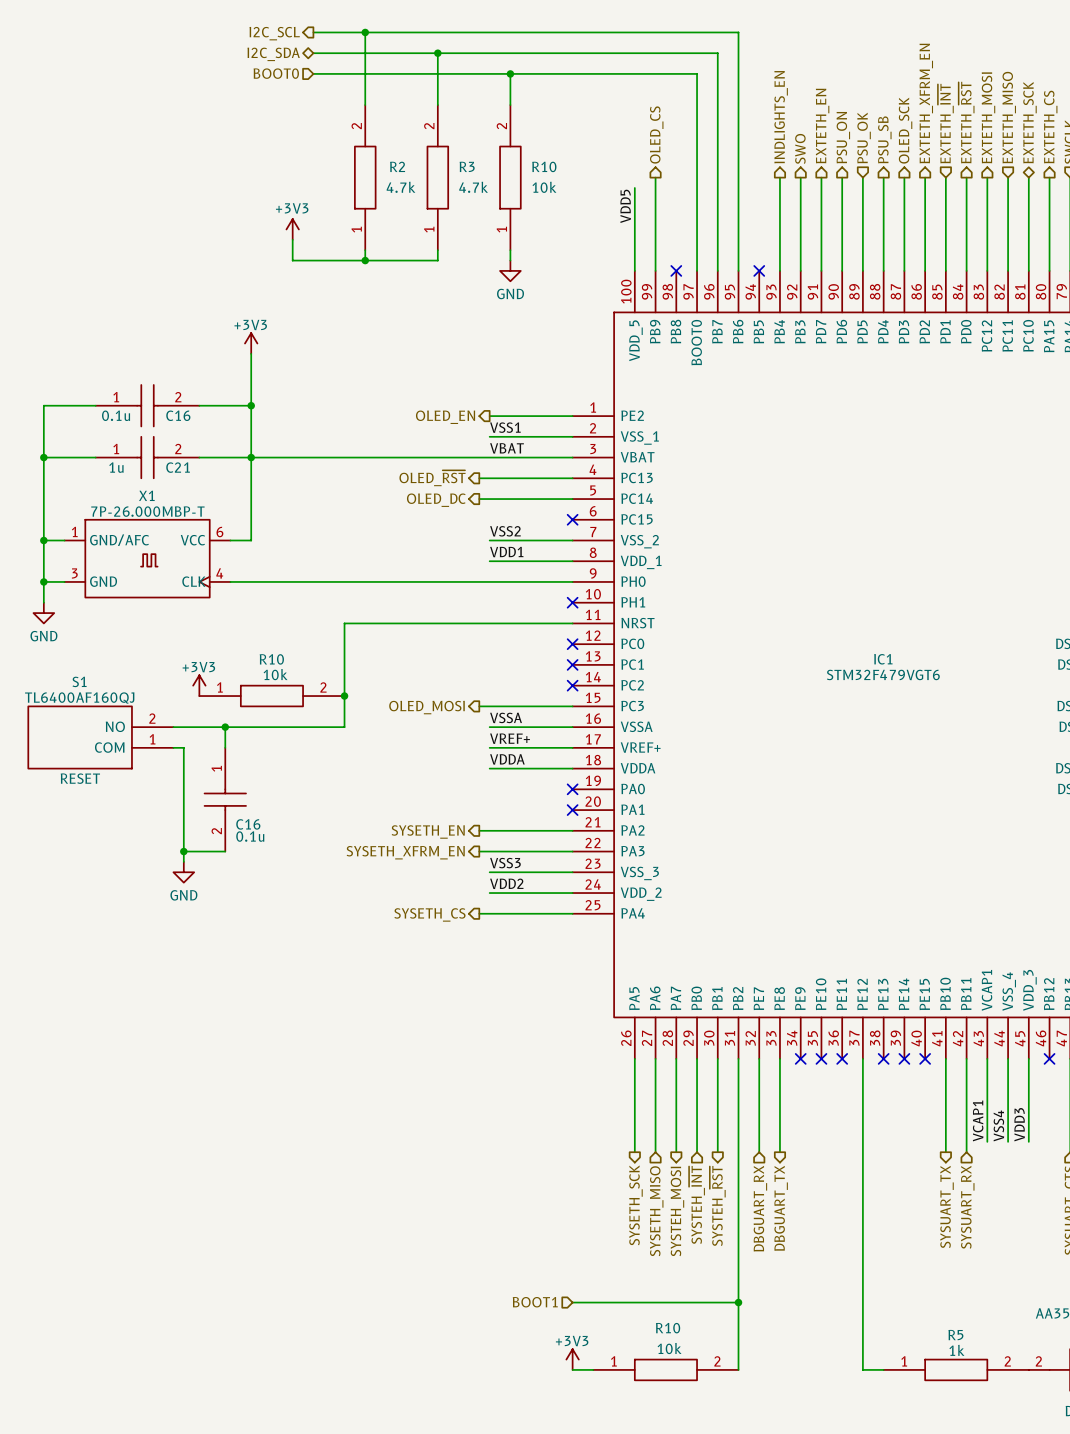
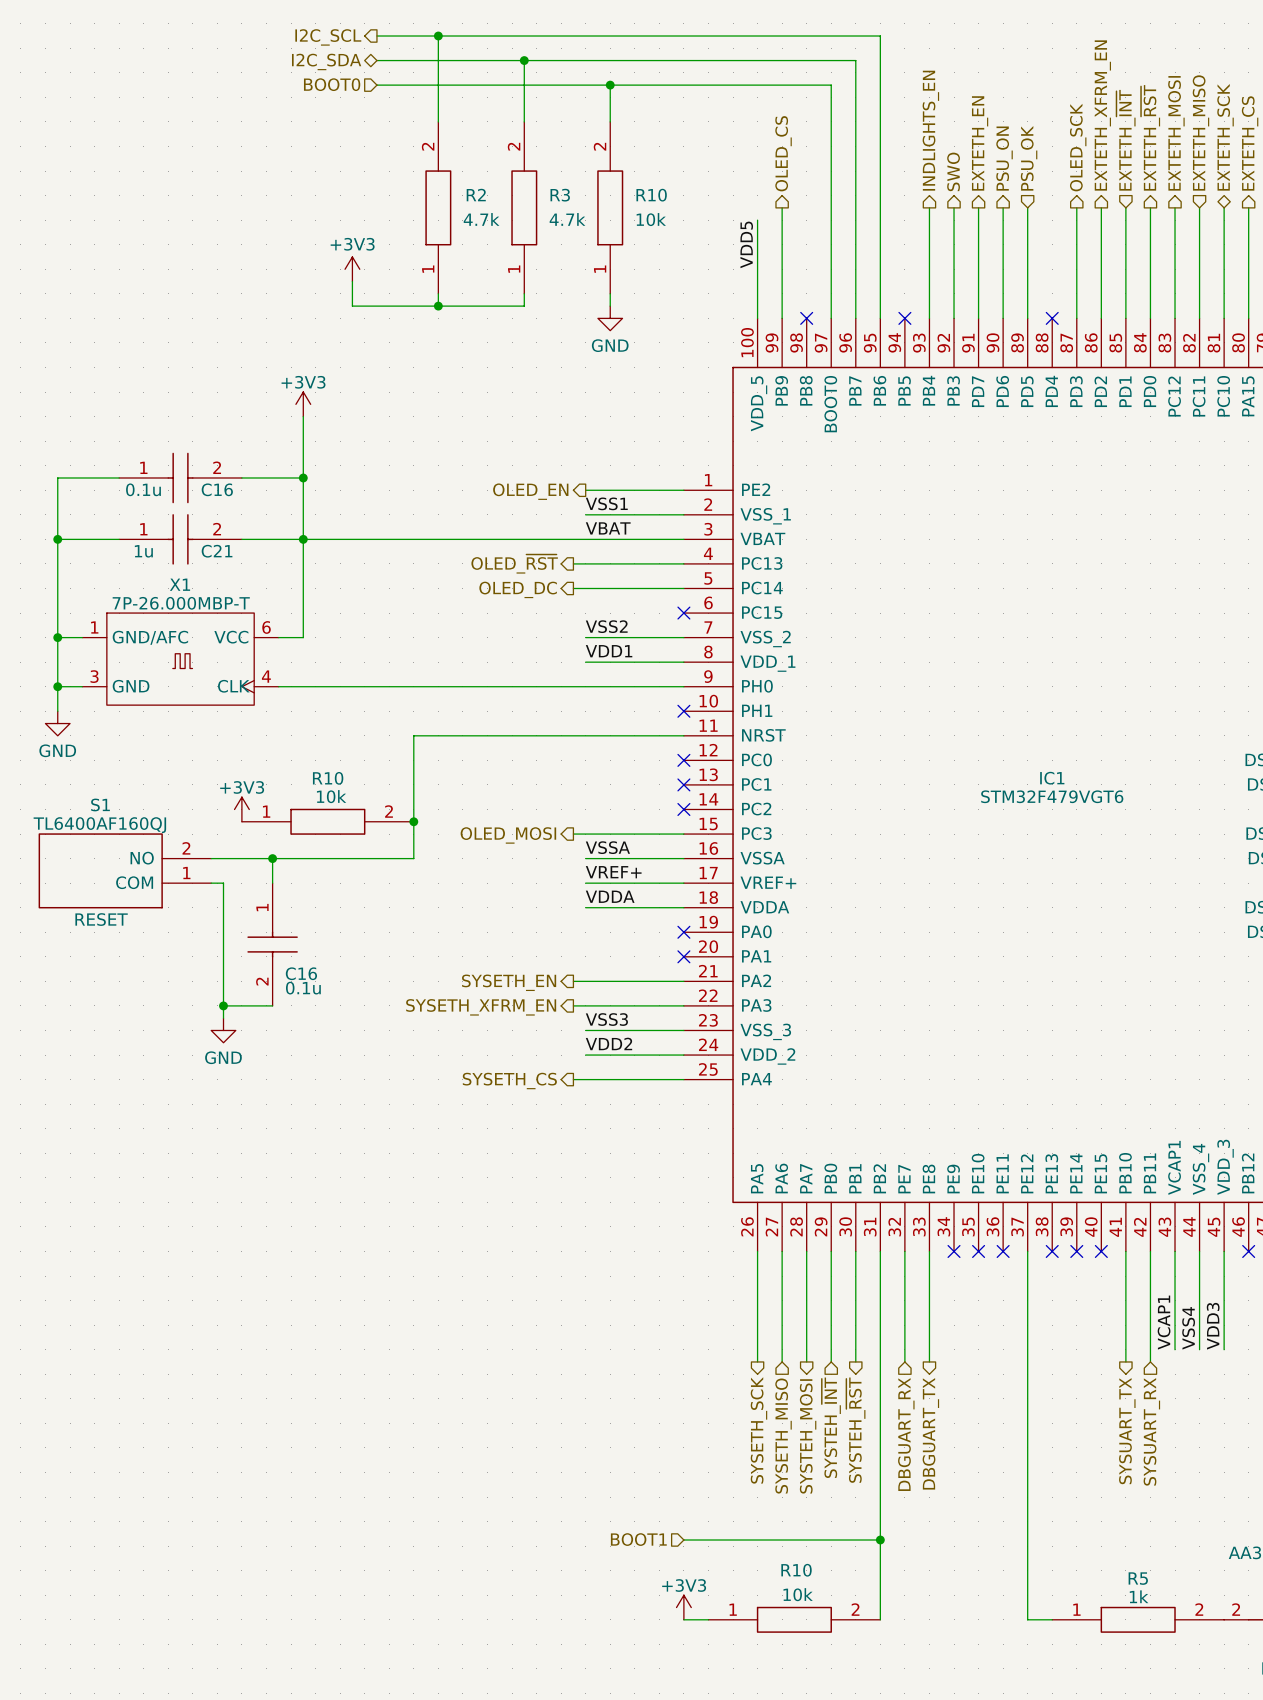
hierarchical label: PSU_SB (884, 139) -> none
wire: (883, 177) (883, 270) -> none
no-connect mark: none -> (1052, 318)

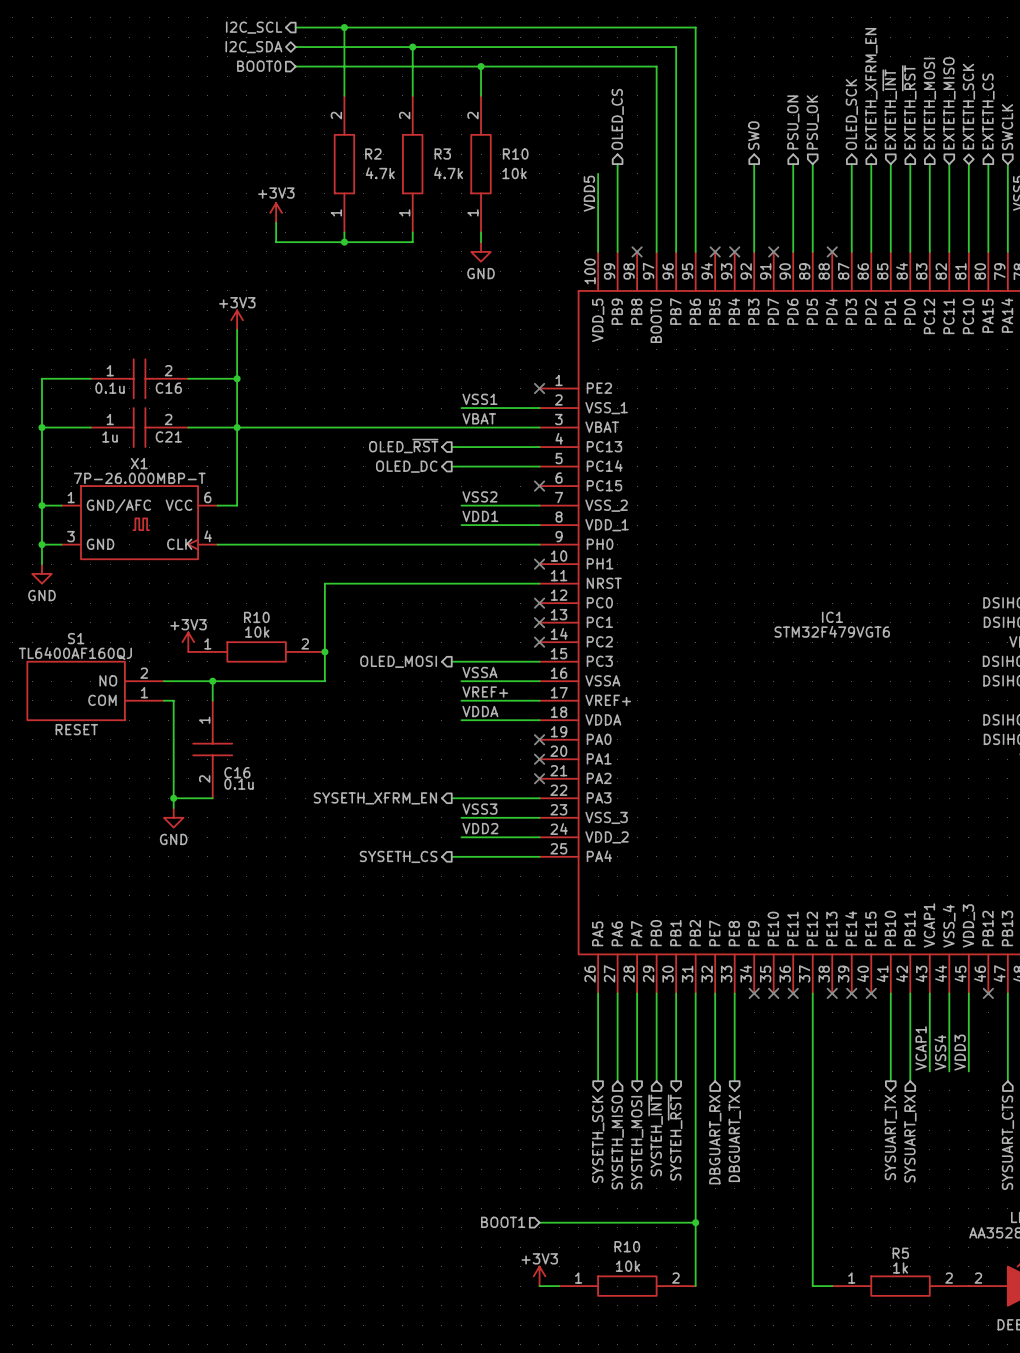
hierarchical label: INDLIGHTS_EN (930, 130) -> none
hierarchical label: EXTETH_EN (980, 143) -> none
wire: (929, 207) (929, 318) -> none
wire: (978, 207) (978, 318) -> none
no-connect mark: none -> (734, 251)
no-connect mark: none -> (773, 251)
wire: (585, 490) (683, 490) -> none
no-connect mark: none -> (539, 388)
hierarchical label: OLED_EN (530, 491) -> none
wire: (573, 981) (683, 981) -> none
no-connect mark: none -> (539, 778)
hierarchical label: SYSETH_EN (509, 982) -> none

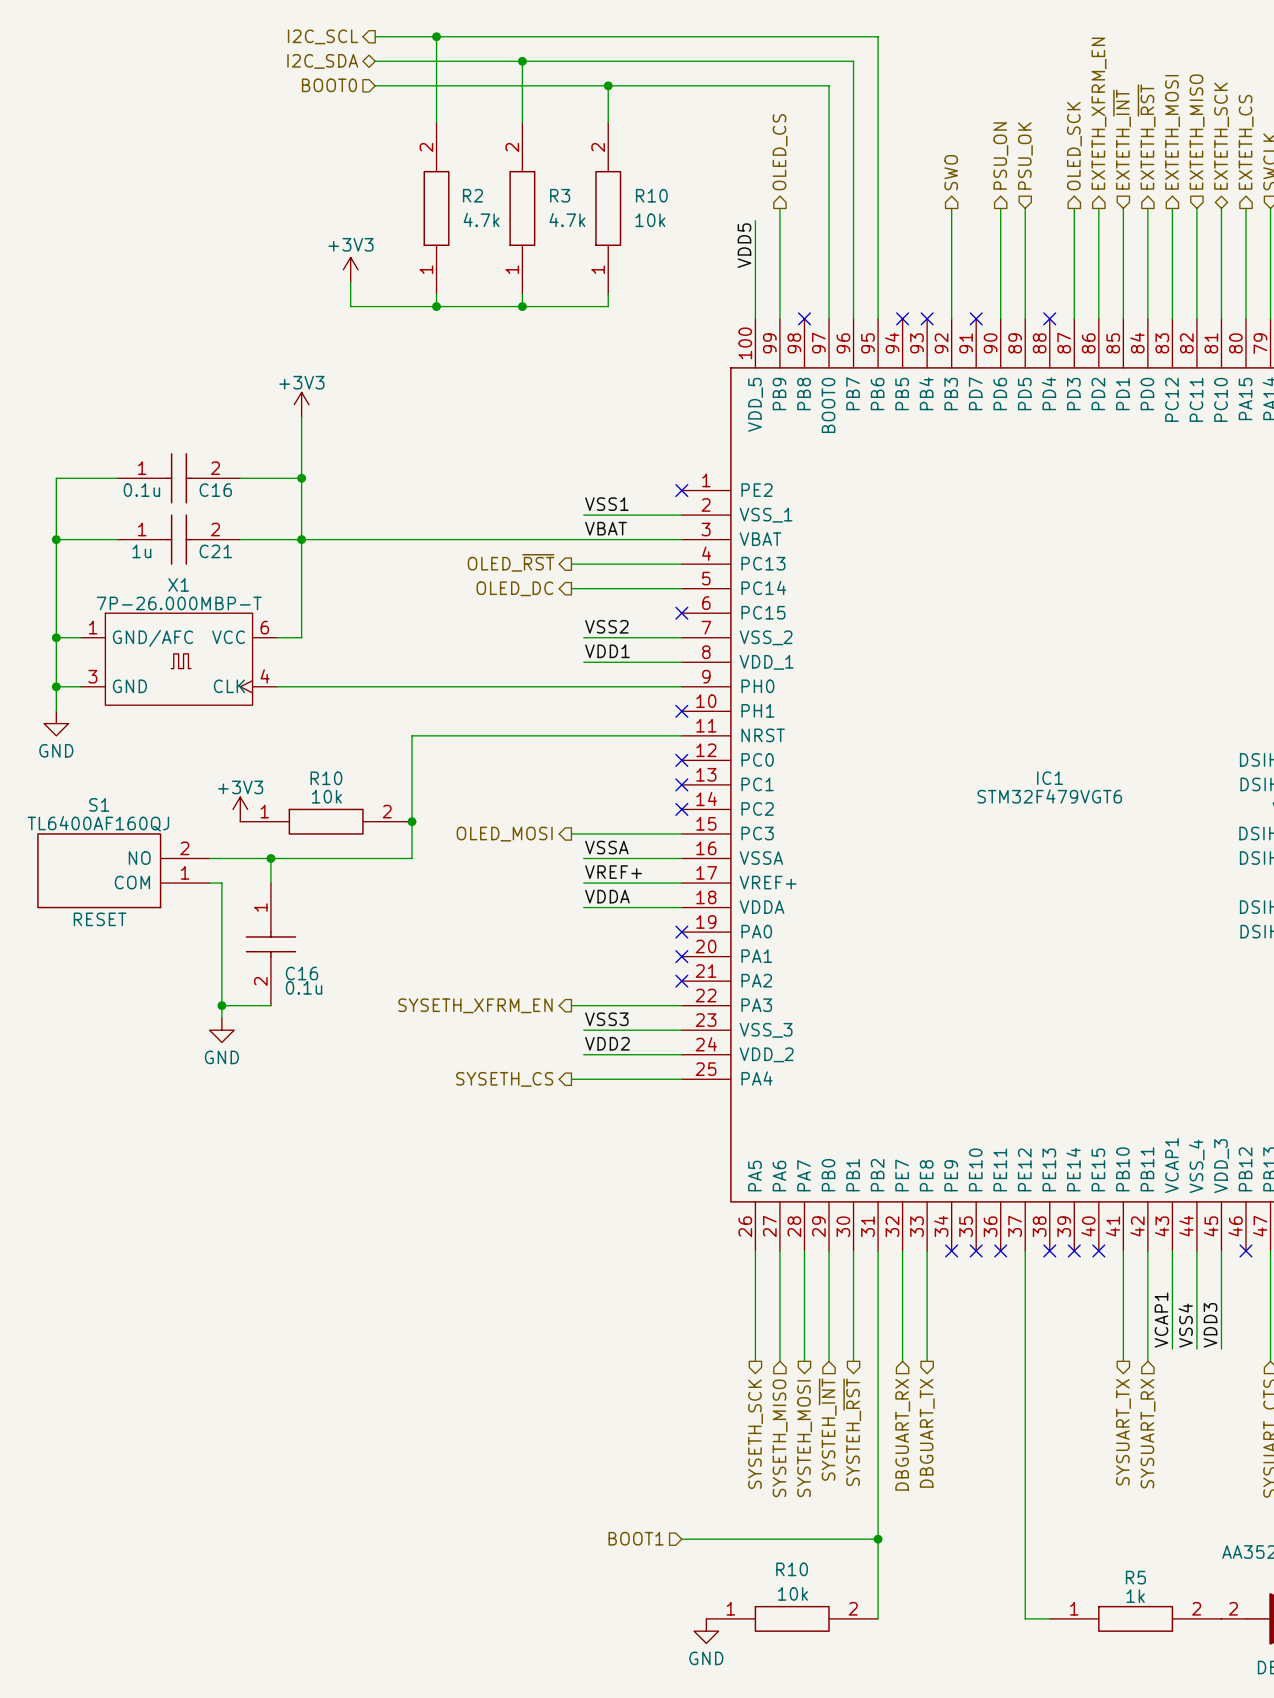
wire: none -> (522, 306) (608, 306)
junction: none -> (522, 306)
power symbol: GND (481, 251) -> none
power symbol: +3V3 (539, 1276) -> none
wire: (539, 1286) (559, 1286) -> none
power symbol: none -> GND (706, 1631)

